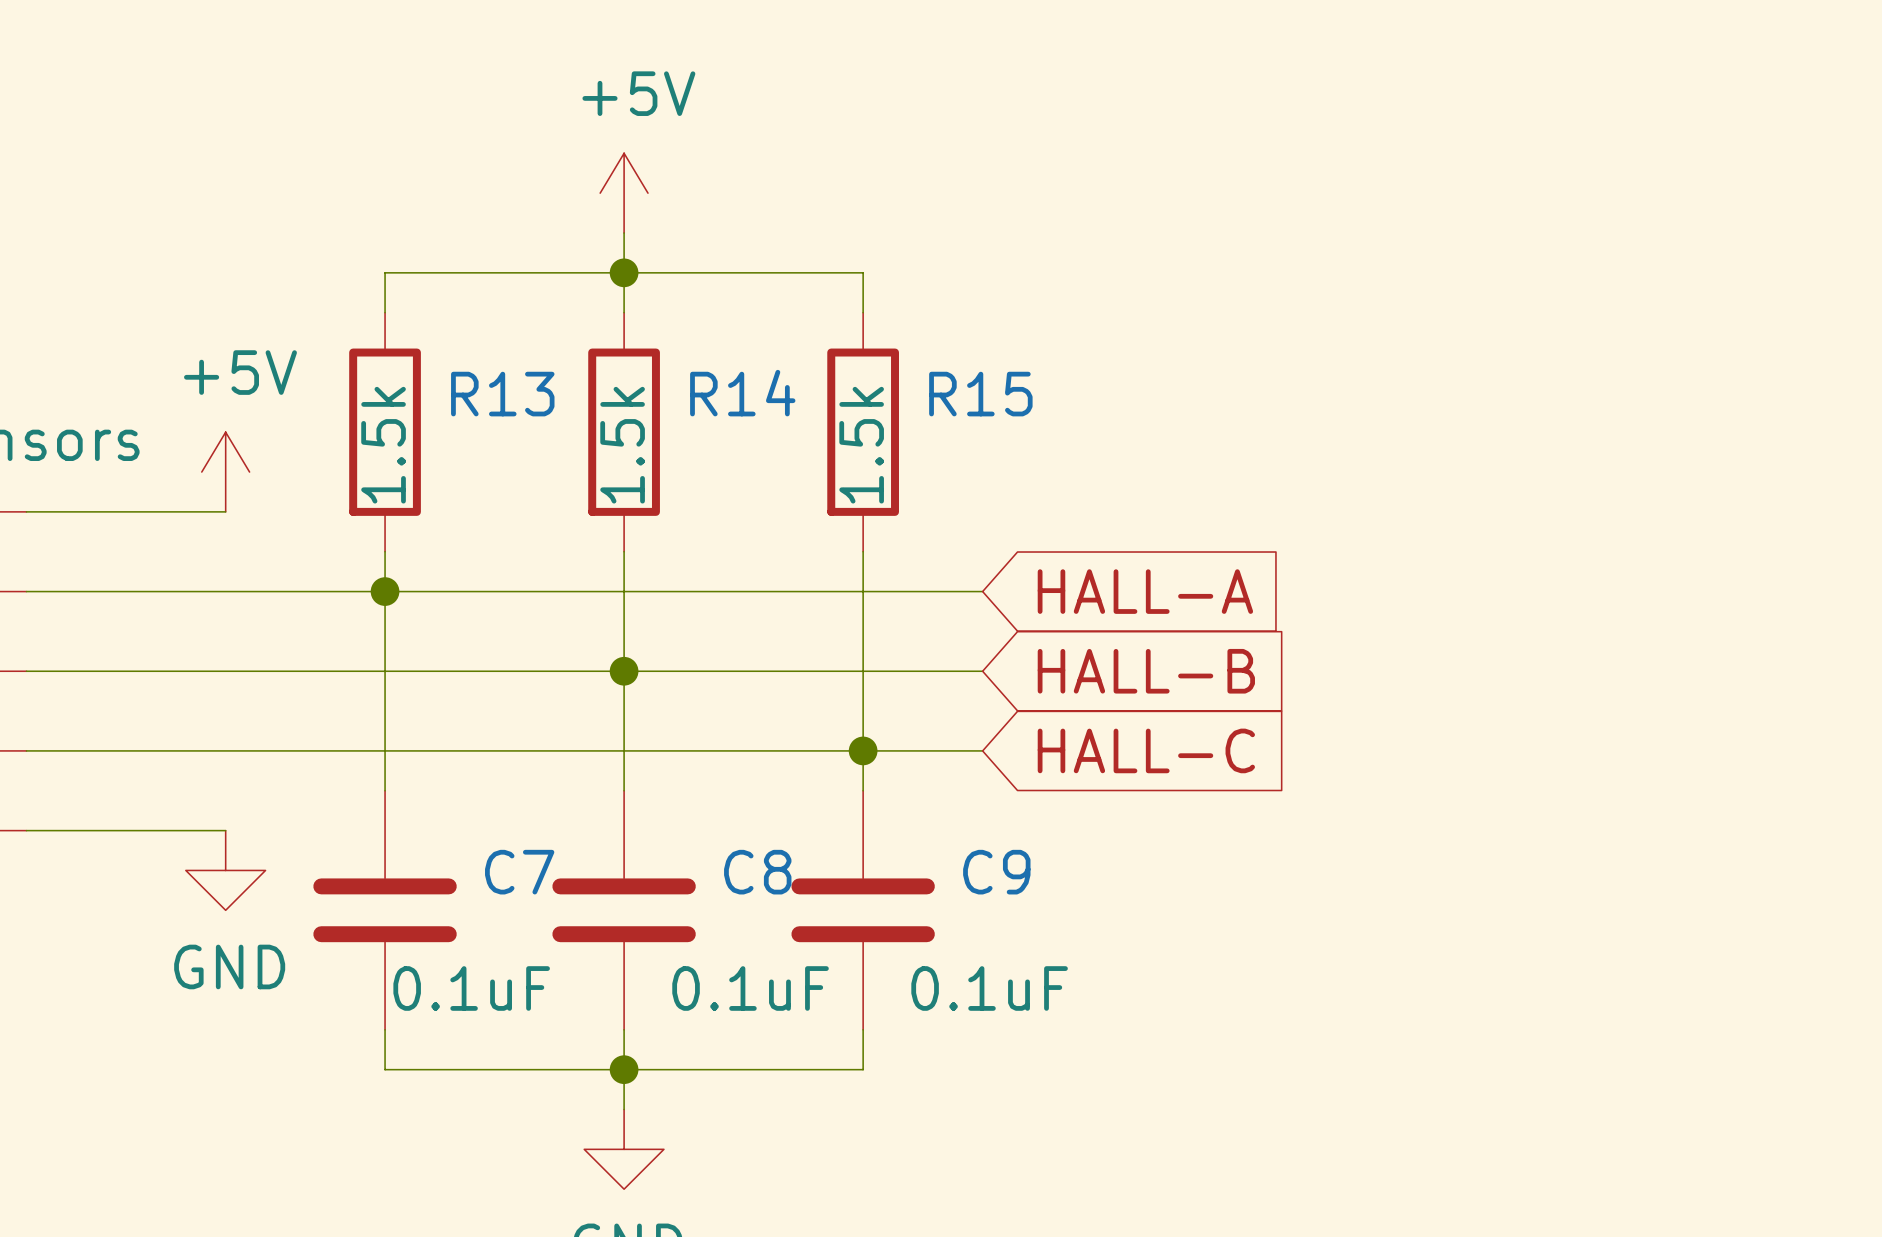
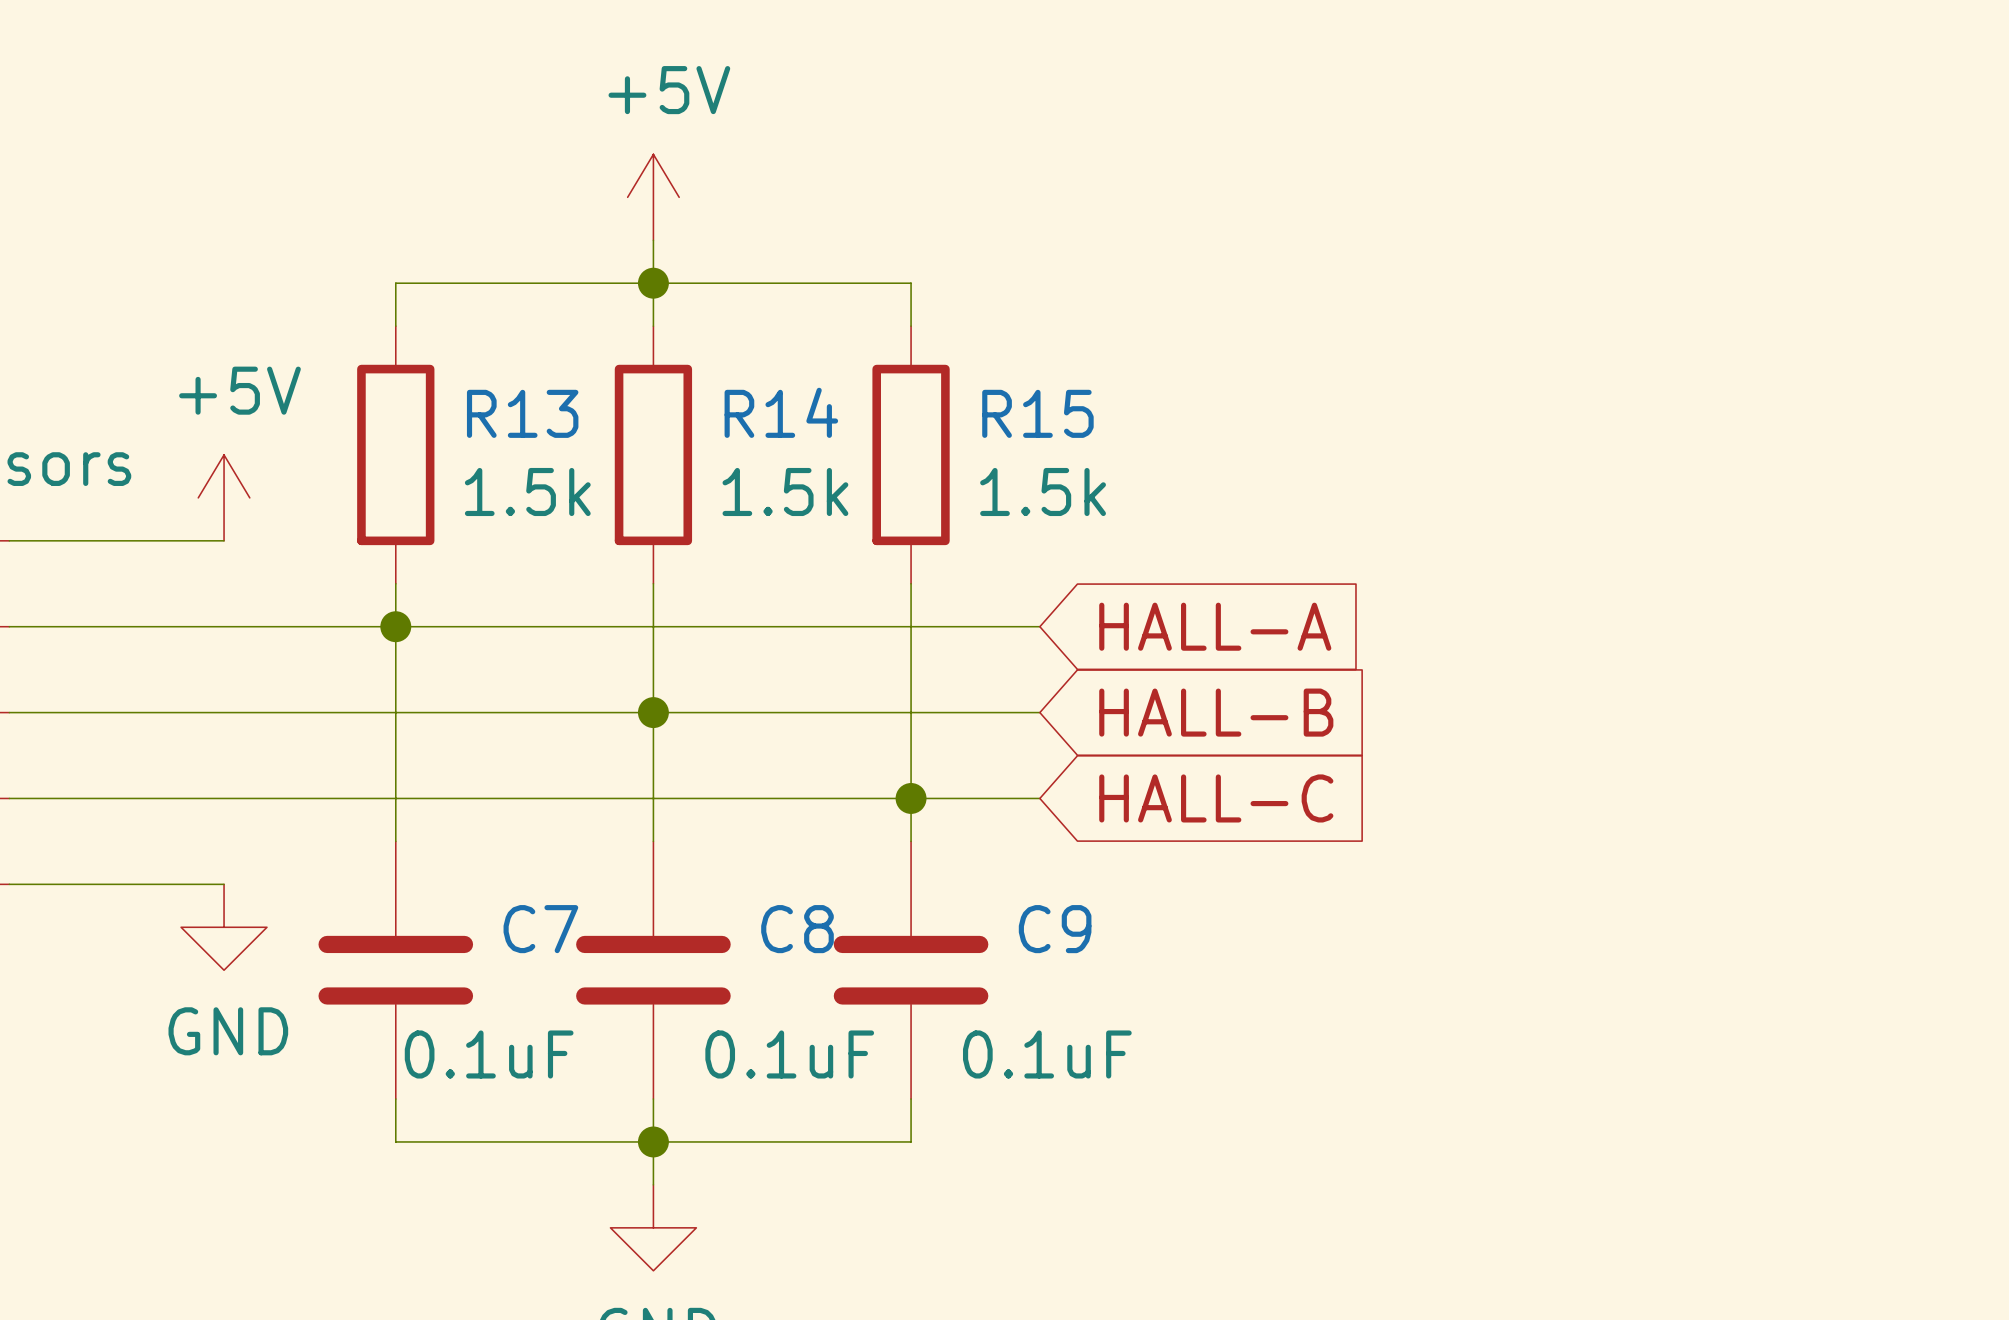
R13 value rotation: 0° (383, 445) -> 90° clockwise (527, 491)
R14 value rotation: 0° (622, 445) -> 90° clockwise (785, 491)
R15 value rotation: 0° (861, 445) -> 90° clockwise (1043, 491)

